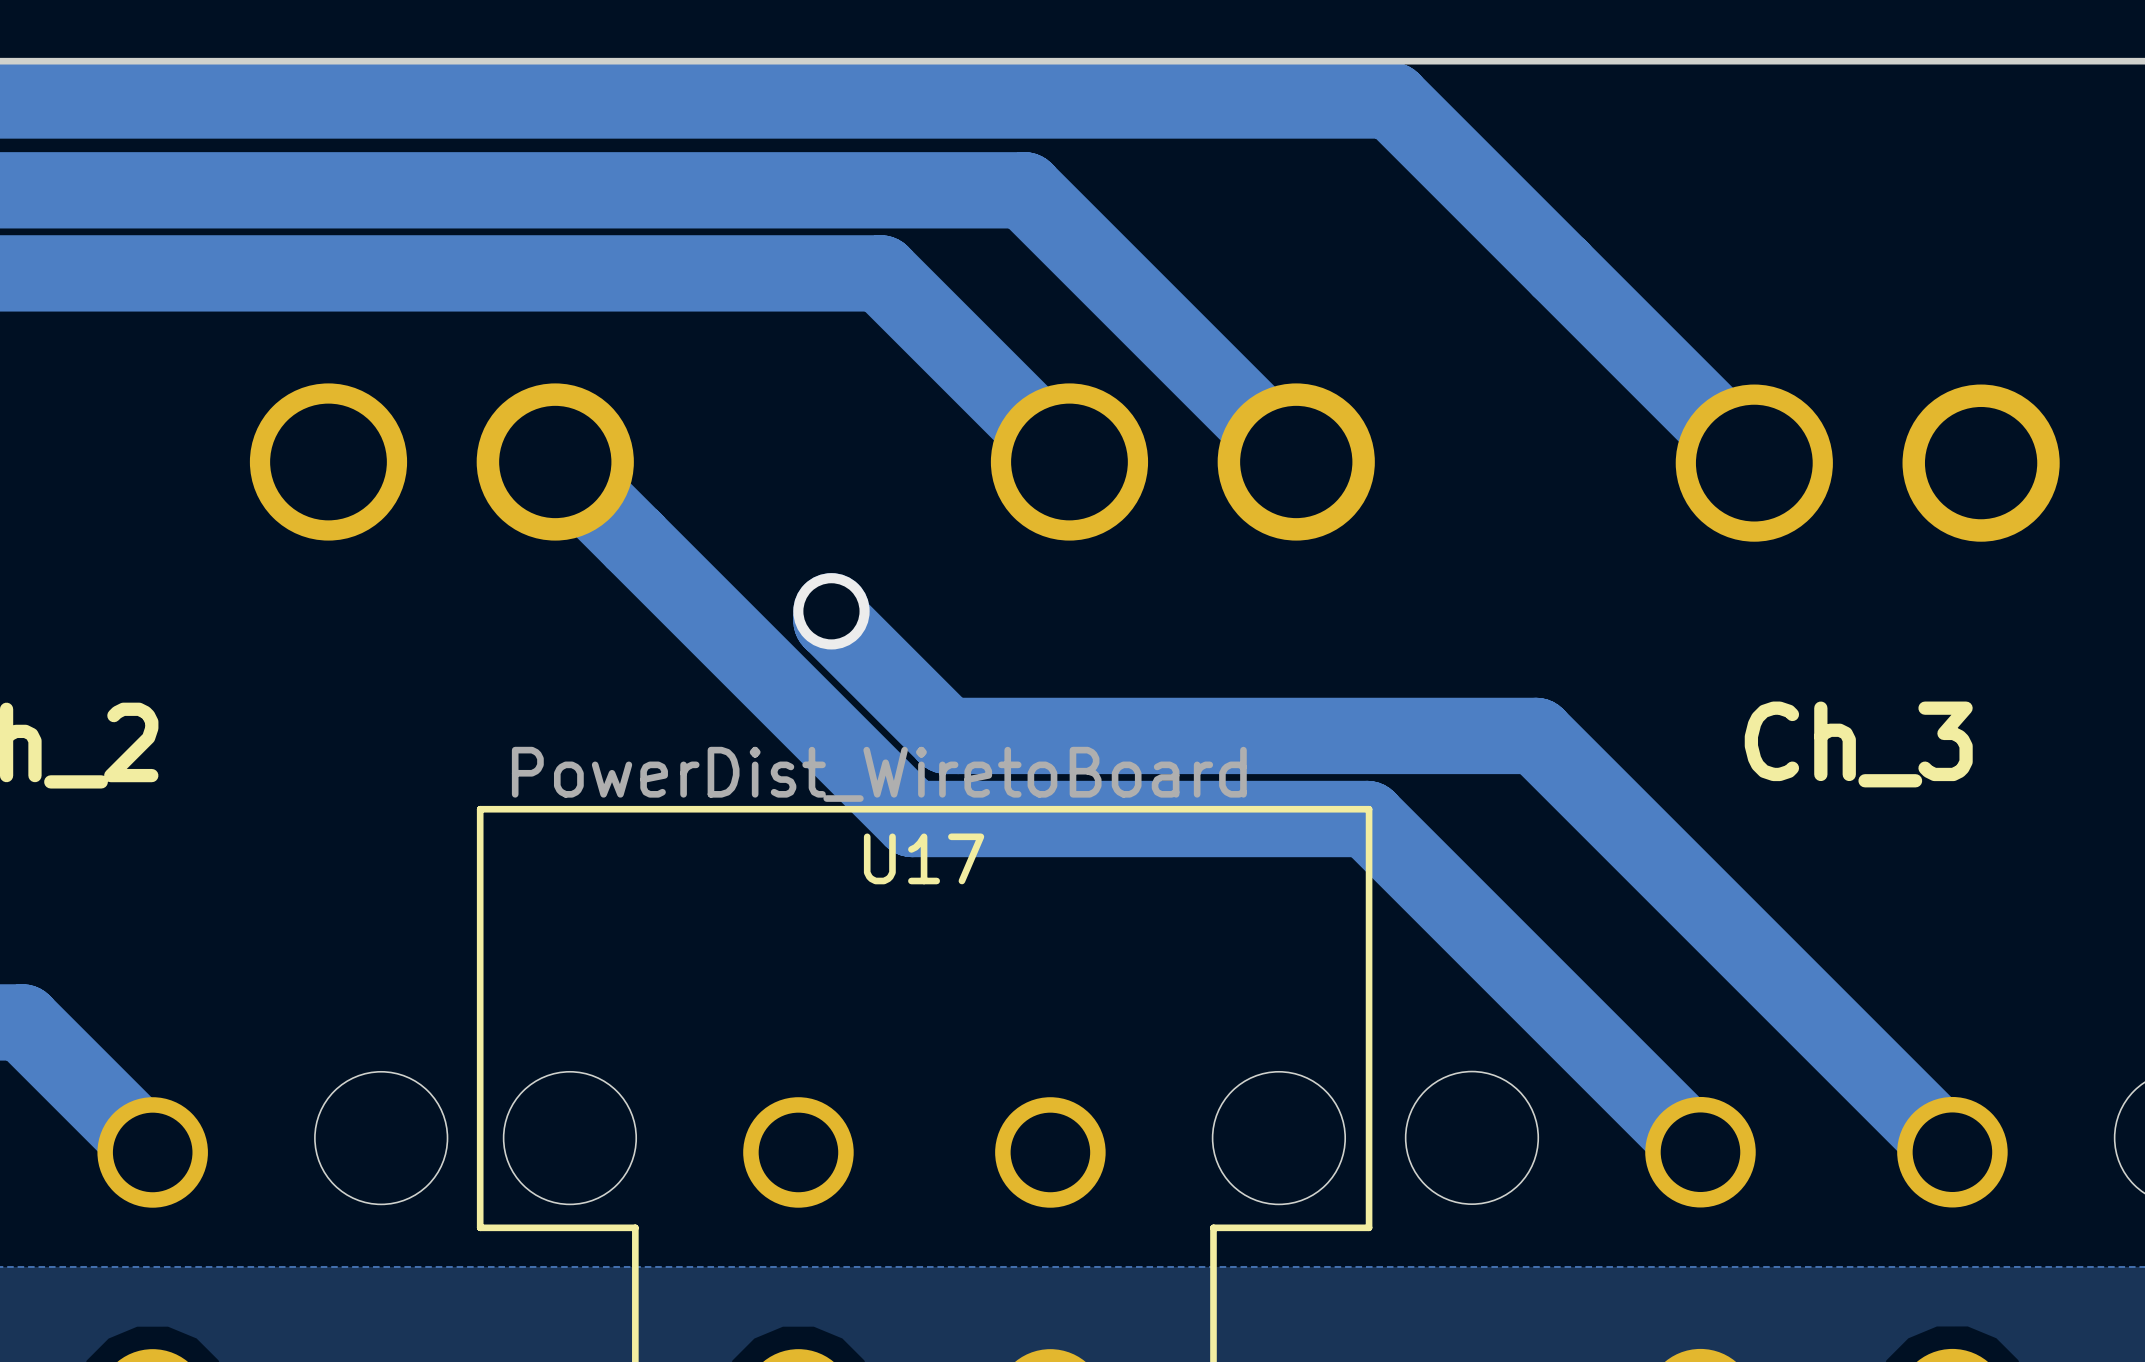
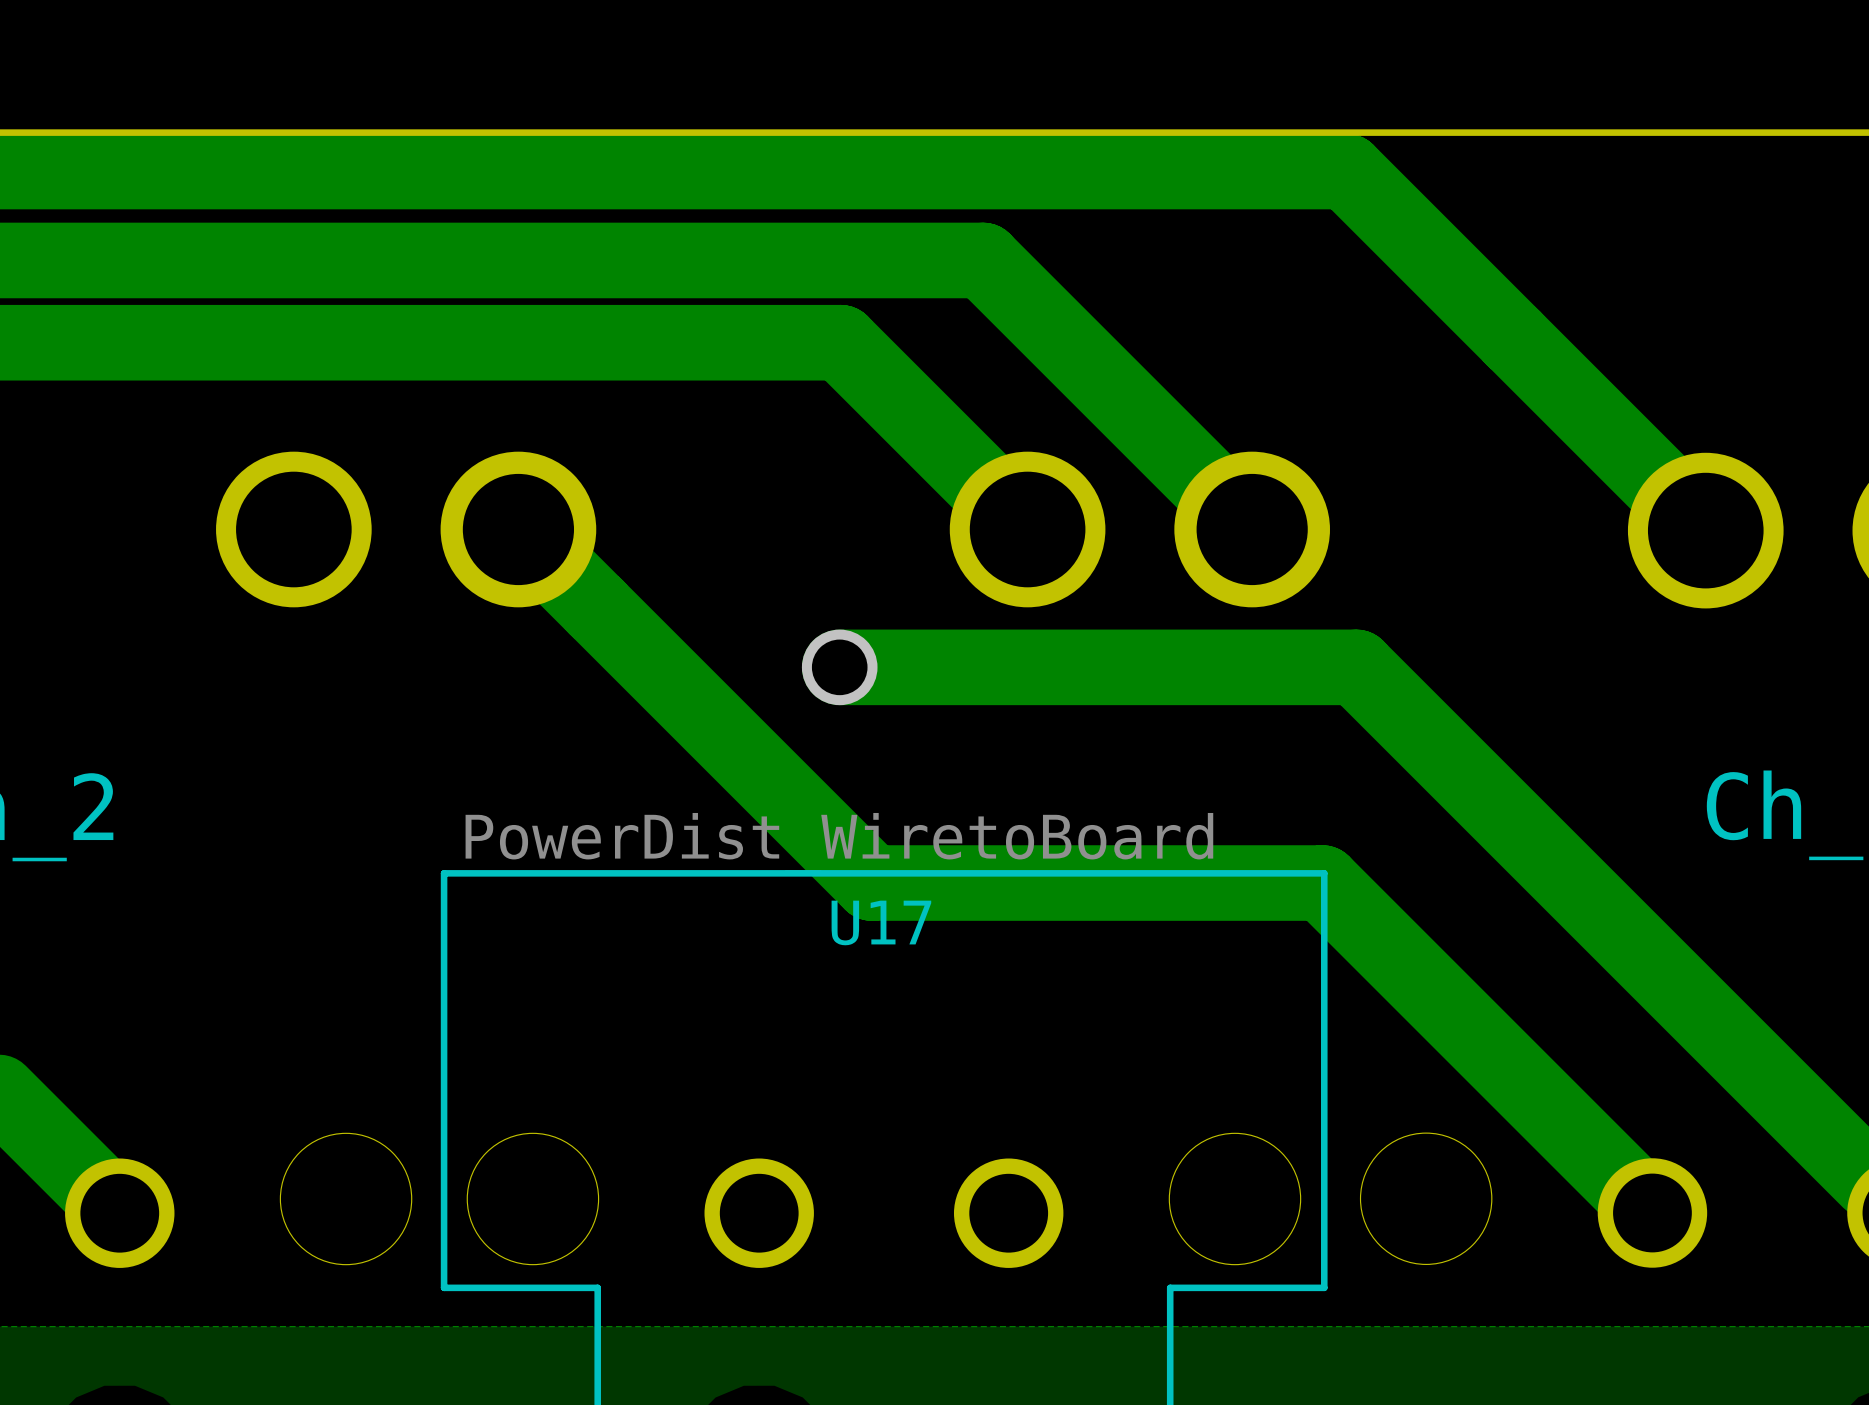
track: (831, 611) (831, 620) (946, 735) (1536, 735) -> (839, 667) (1356, 667) (1489, 800)
via position: (831, 611) -> (839, 667)

